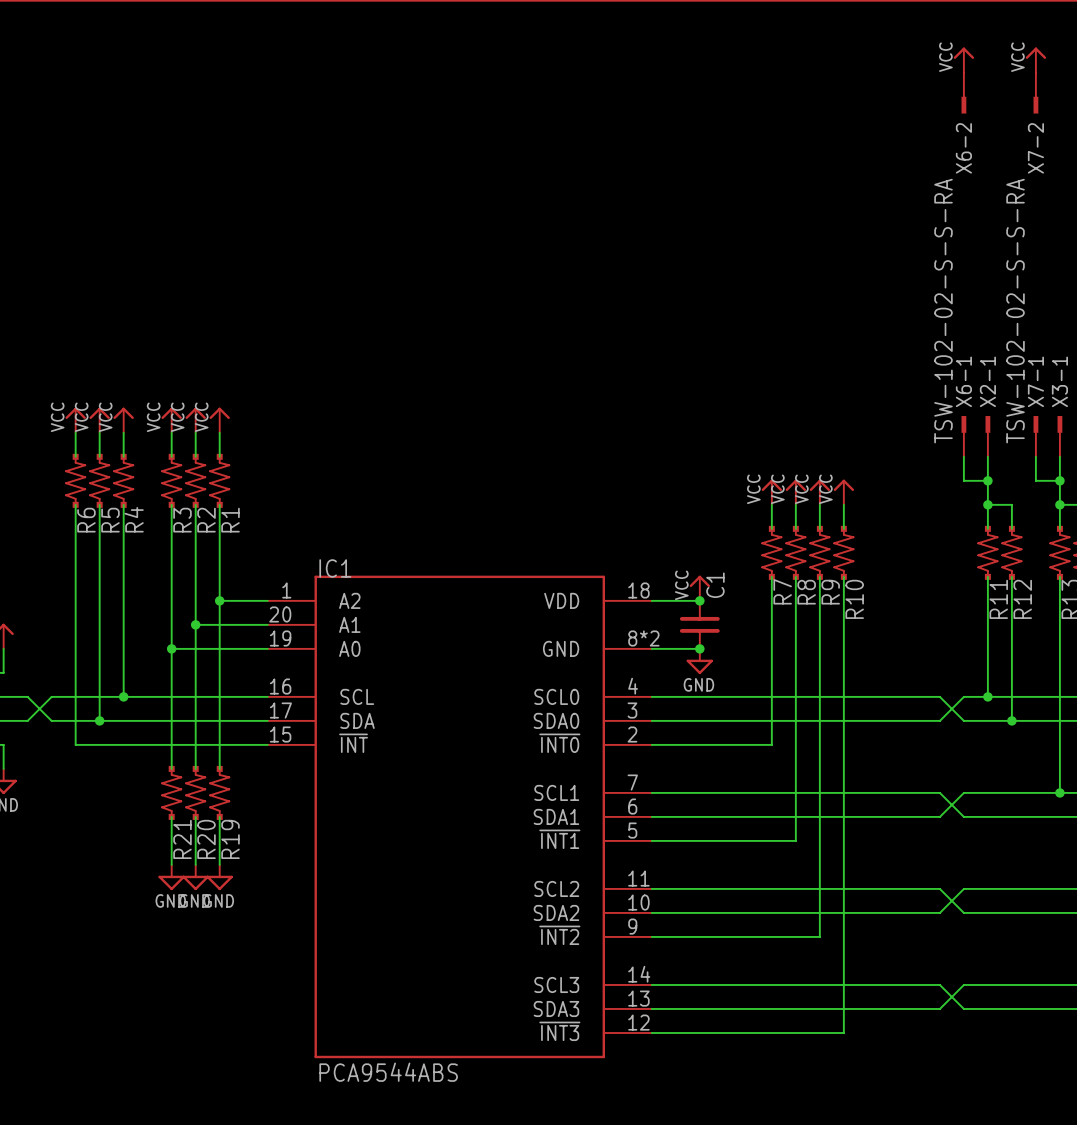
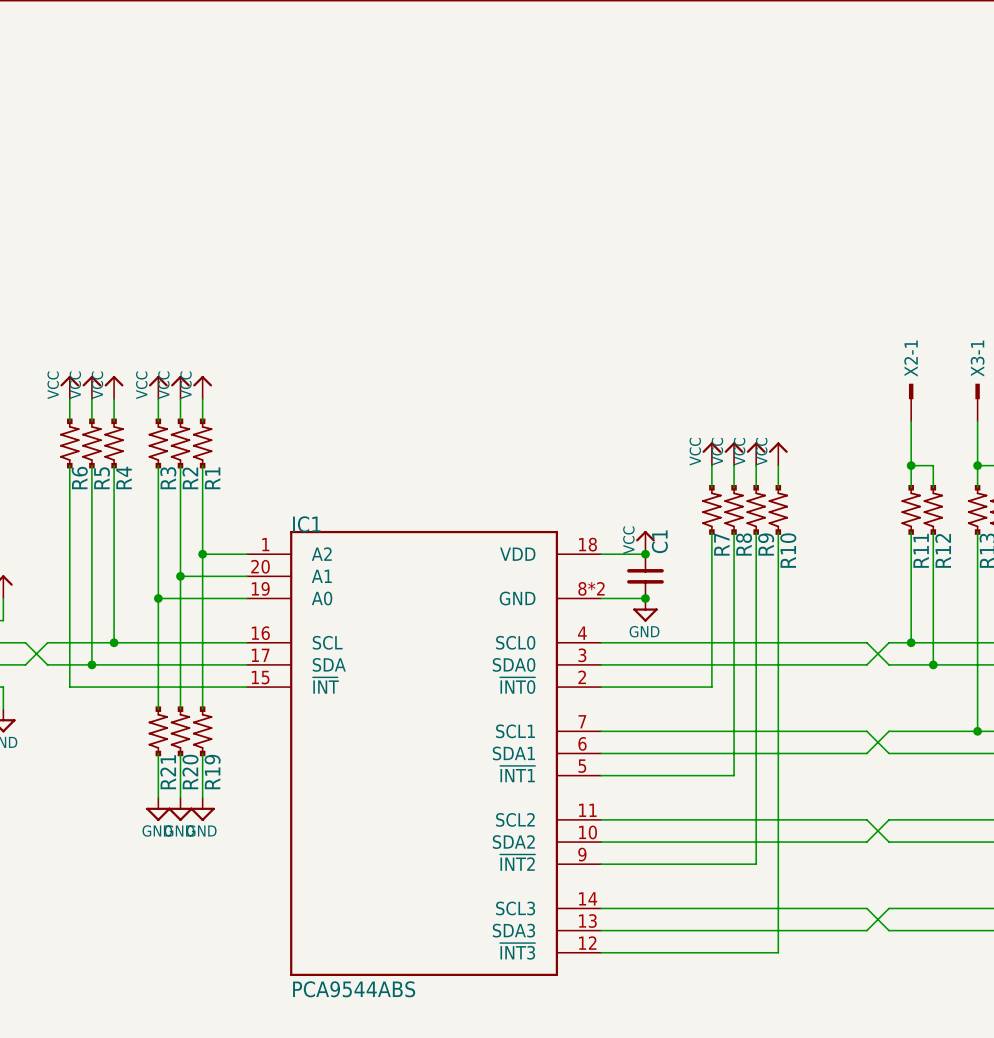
power symbol: VCC (963, 60) -> none
power symbol: VCC (1035, 60) -> none
X6-2: (963, 93) -> none
X7-2: (1035, 93) -> none
X6-1: TSW-102-02-S-S-RA (963, 436) -> none
X7-1: TSW-102-02-S-S-RA (1035, 436) -> none
wire: (963, 456) (963, 480) (987, 480) -> none
wire: (1035, 456) (1035, 480) (1059, 480) -> none
junction: (987, 480) -> none
junction: (1059, 480) -> none

